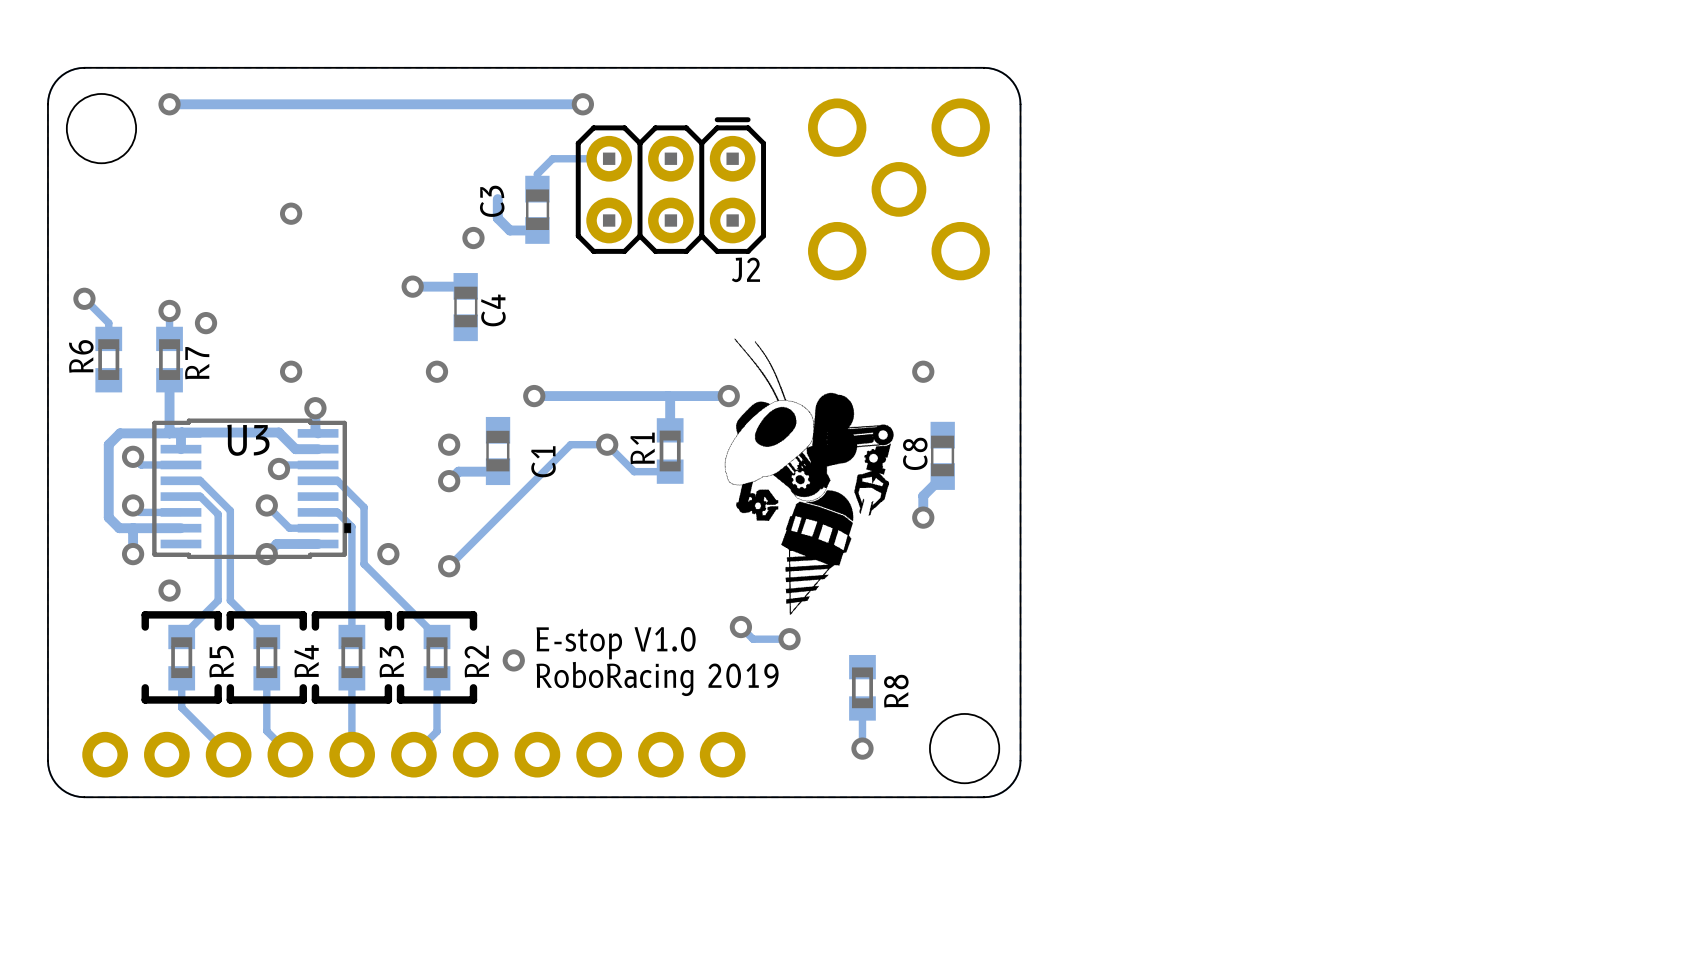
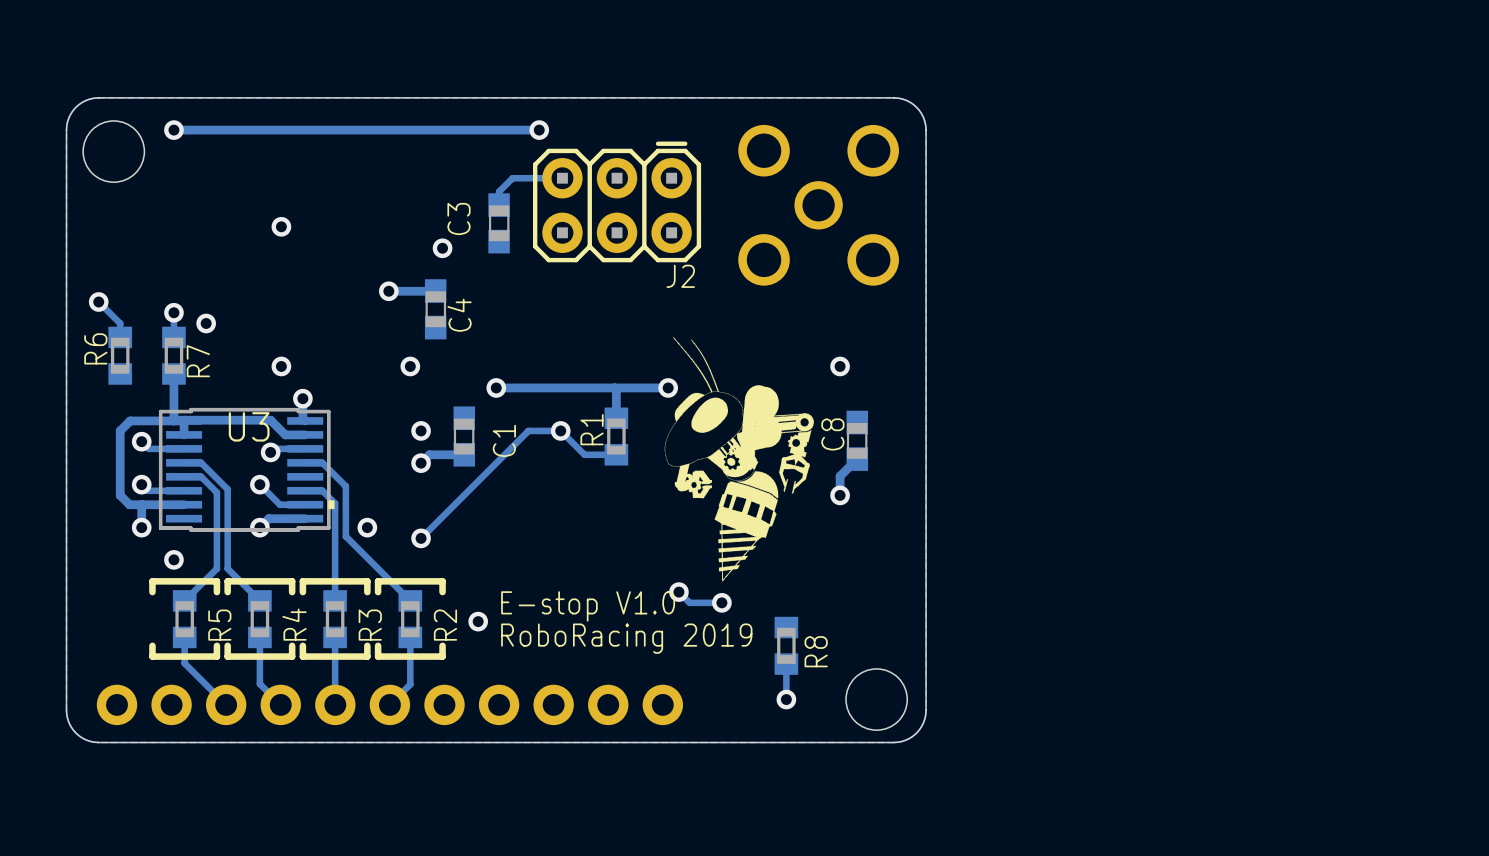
track: (497, 199) (497, 218) (509, 230) (537, 230) -> none

